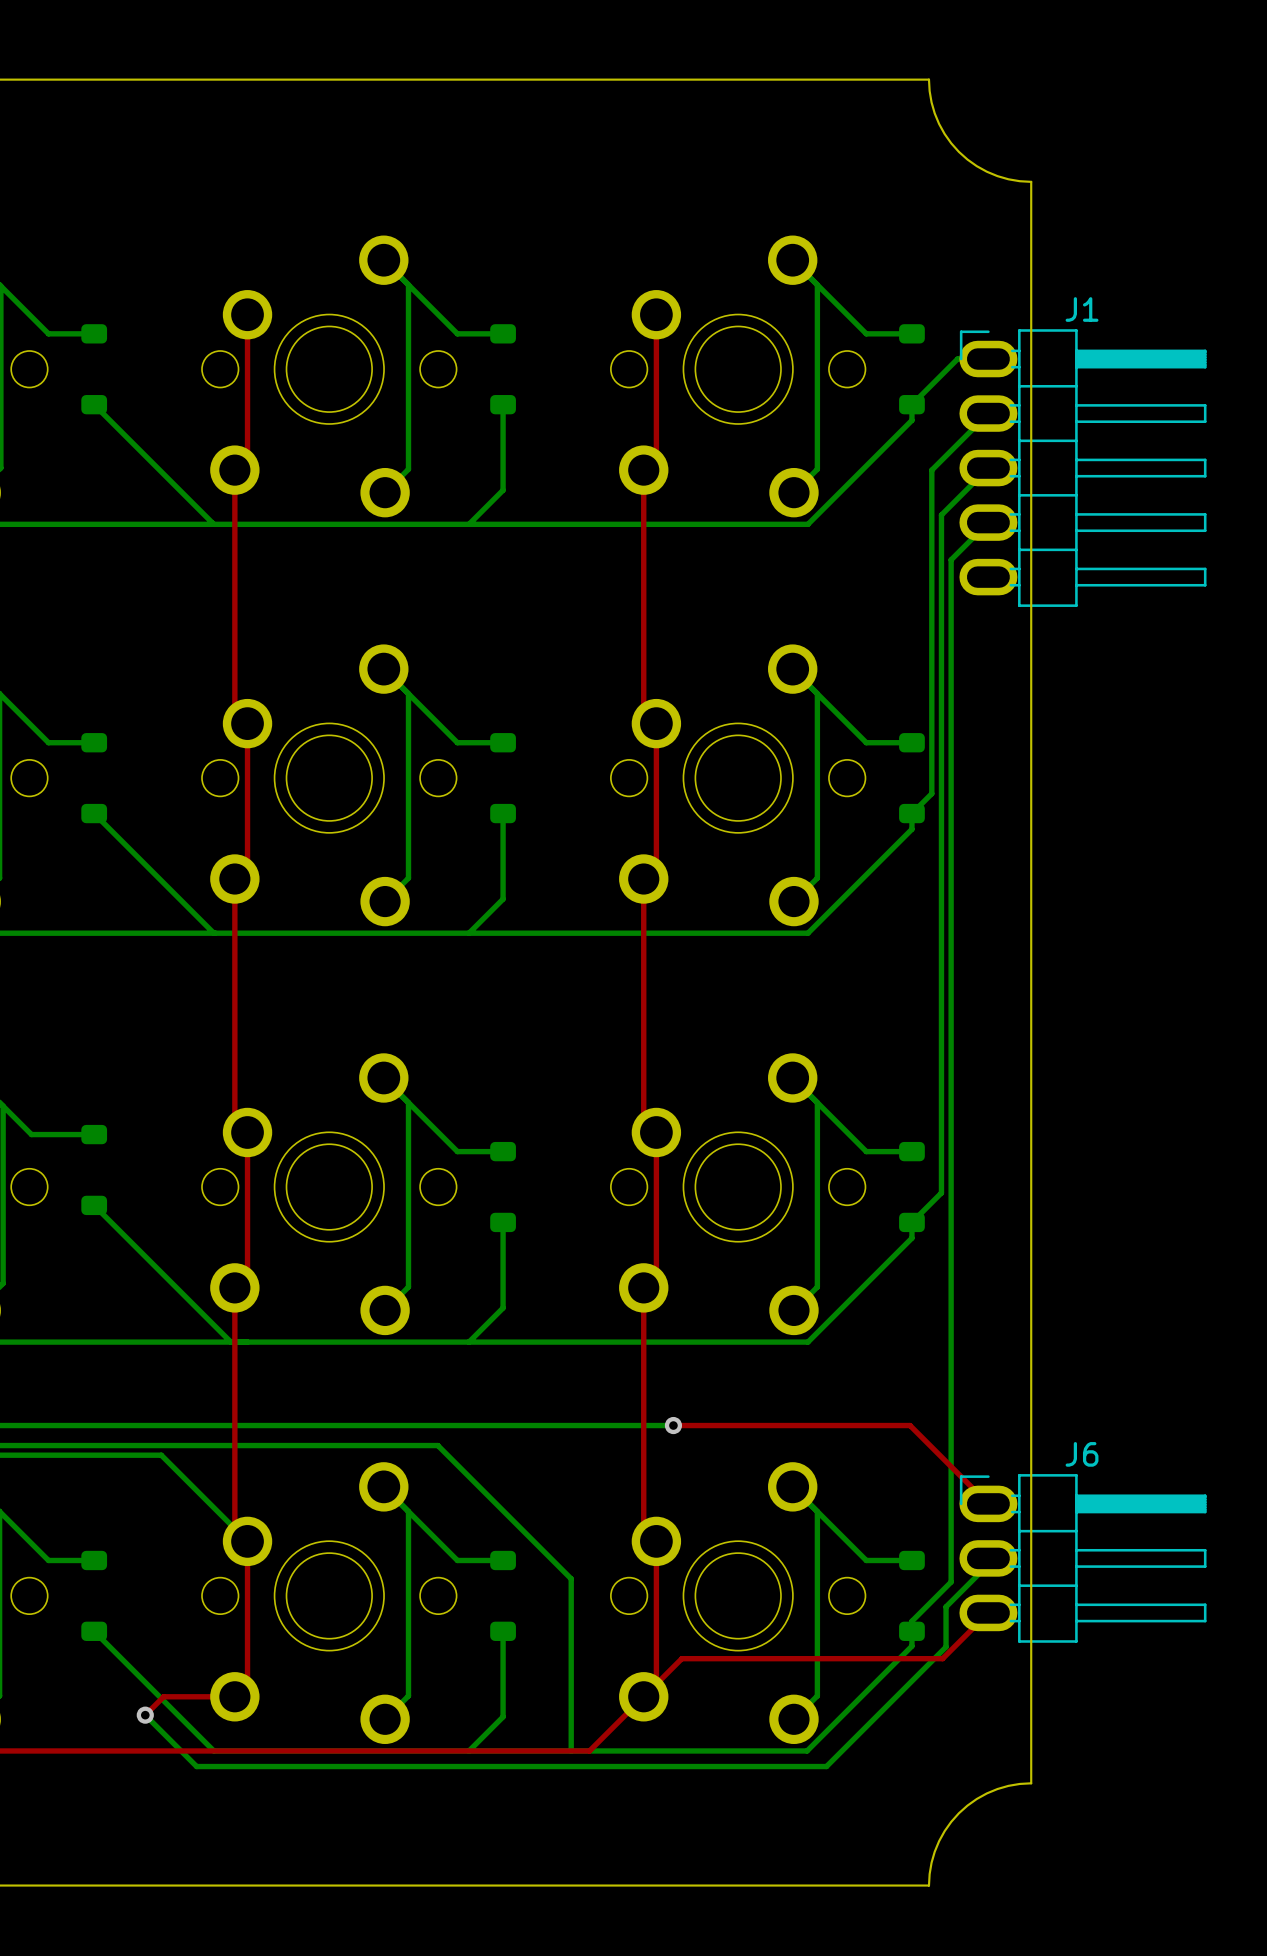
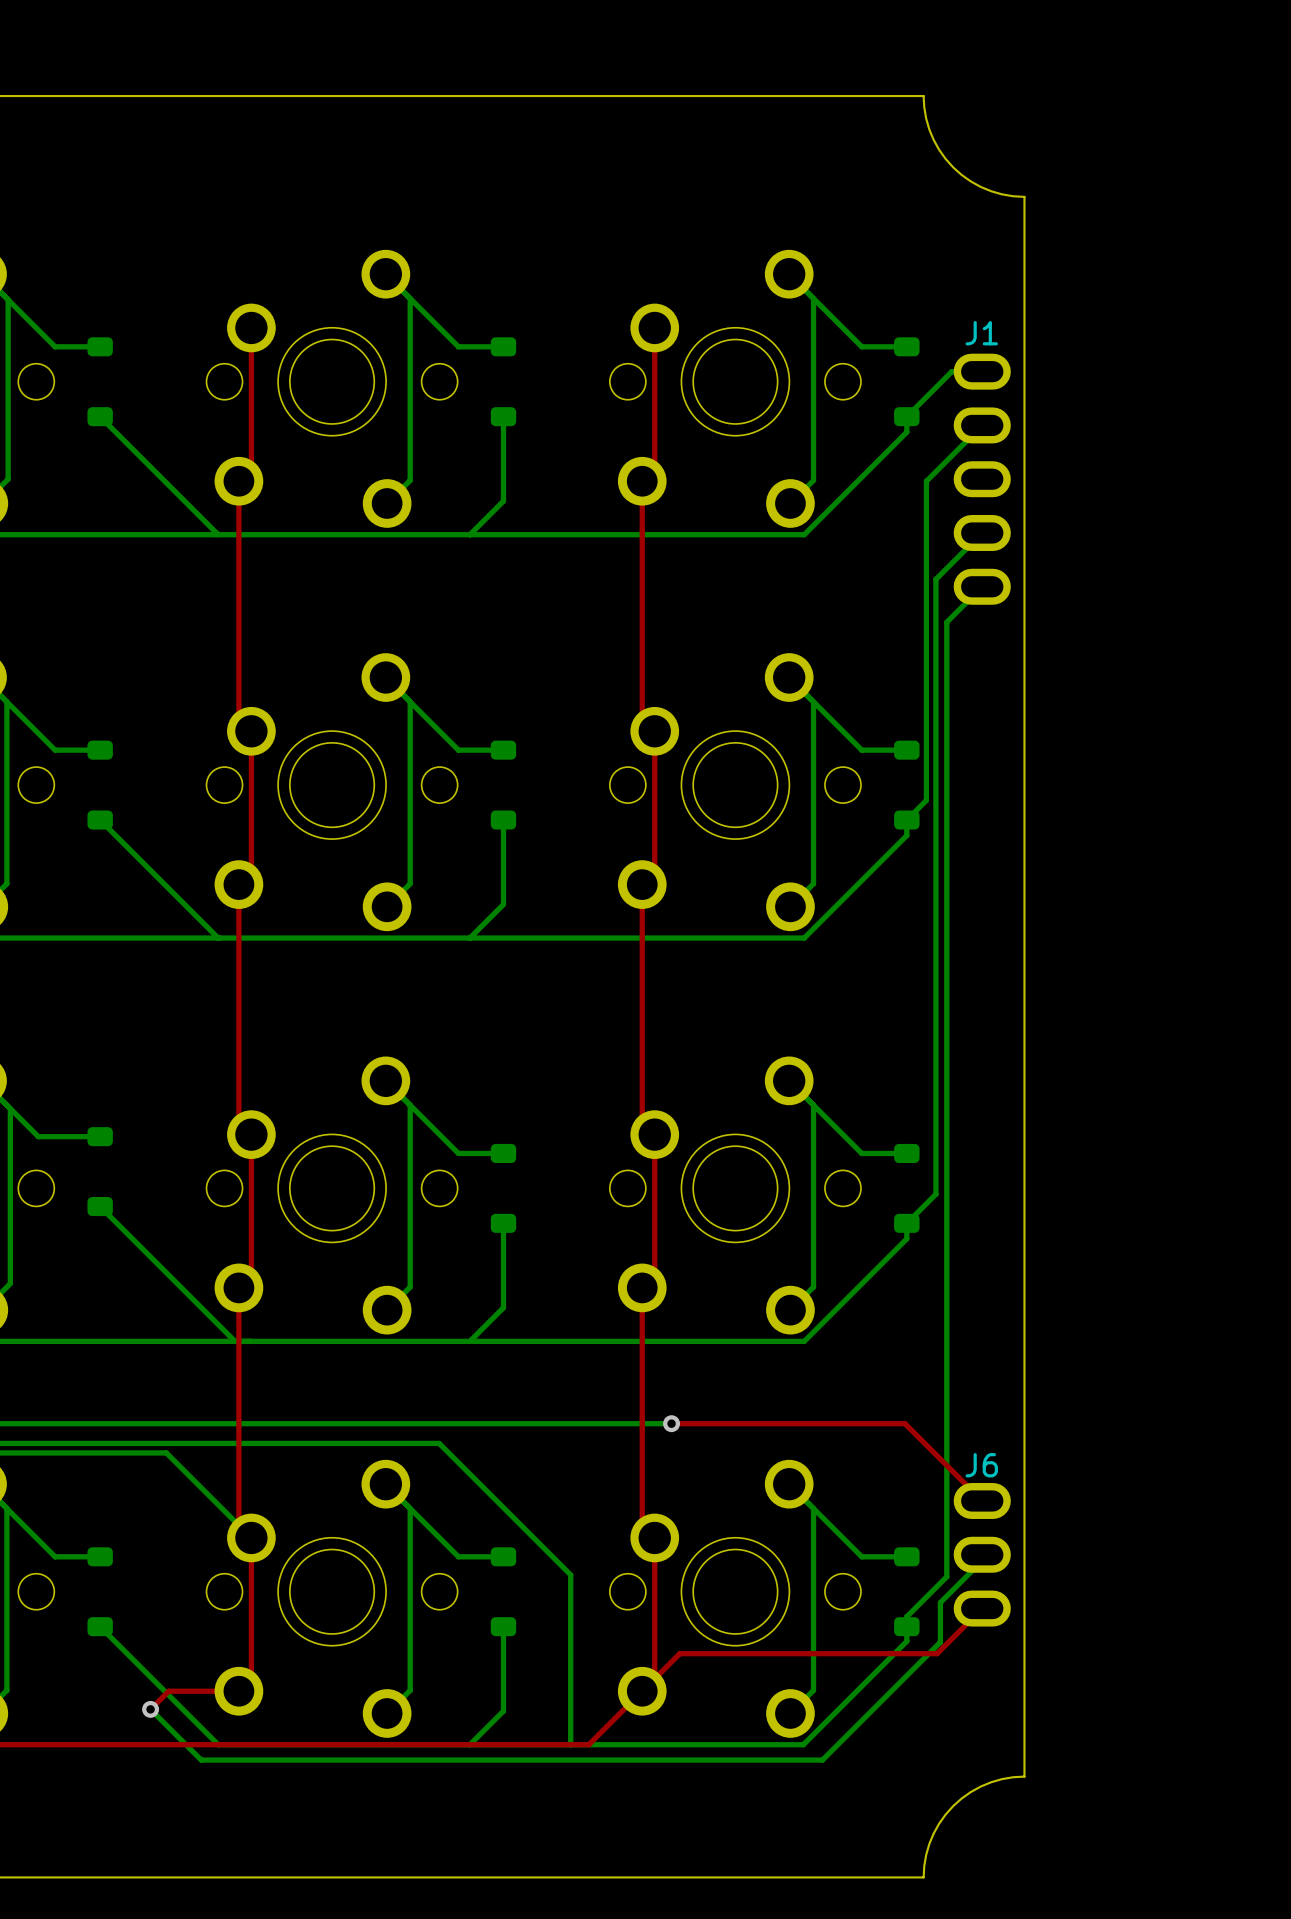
J1 footprint: [959, 329, 1207, 607] -> [953, 353, 1011, 605]
bottom track: (988, 468) (941, 515) (941, 569) -> (945, 569) (935, 579)
bottom track: (951, 559) (951, 1582) -> (982, 586) (946, 622) (945, 1578)
J6 footprint: [959, 1474, 1207, 1643] -> [953, 1482, 1011, 1627]

